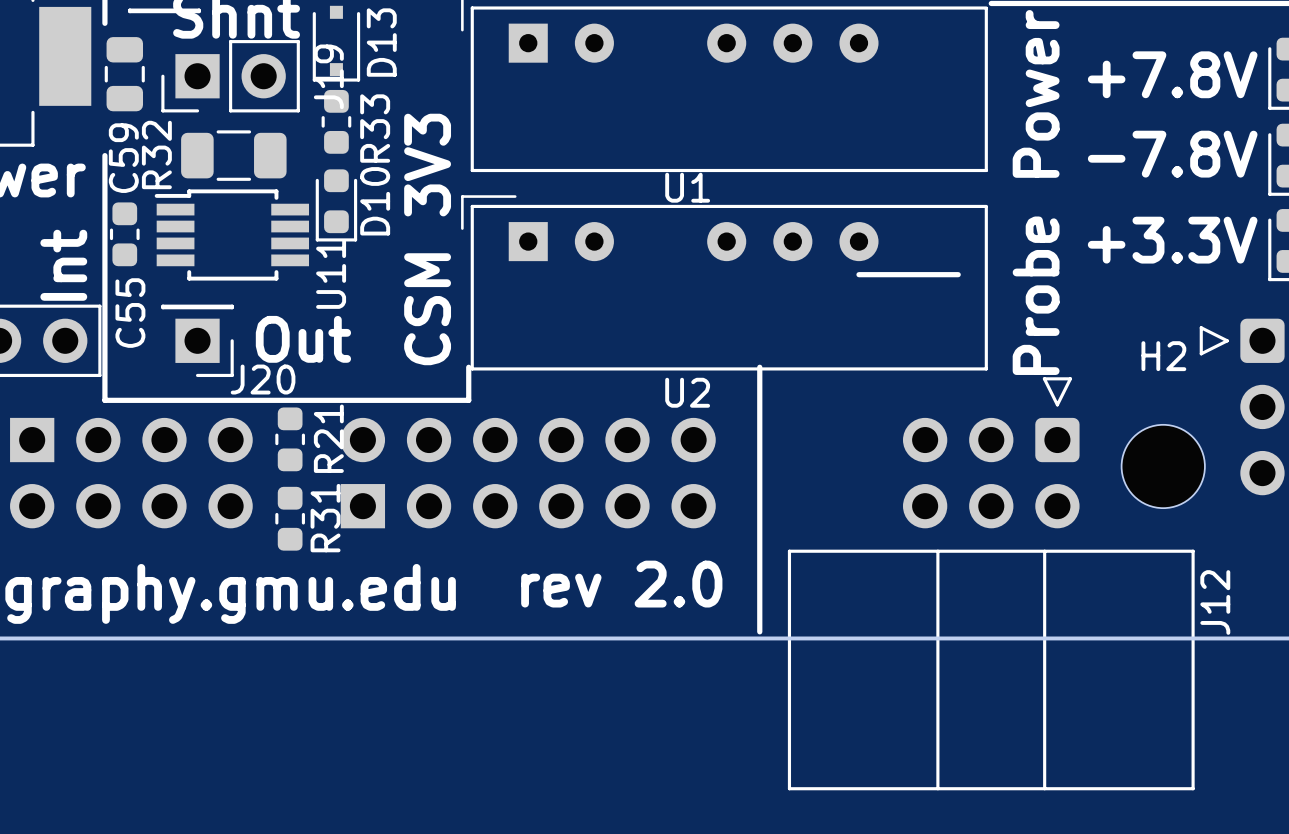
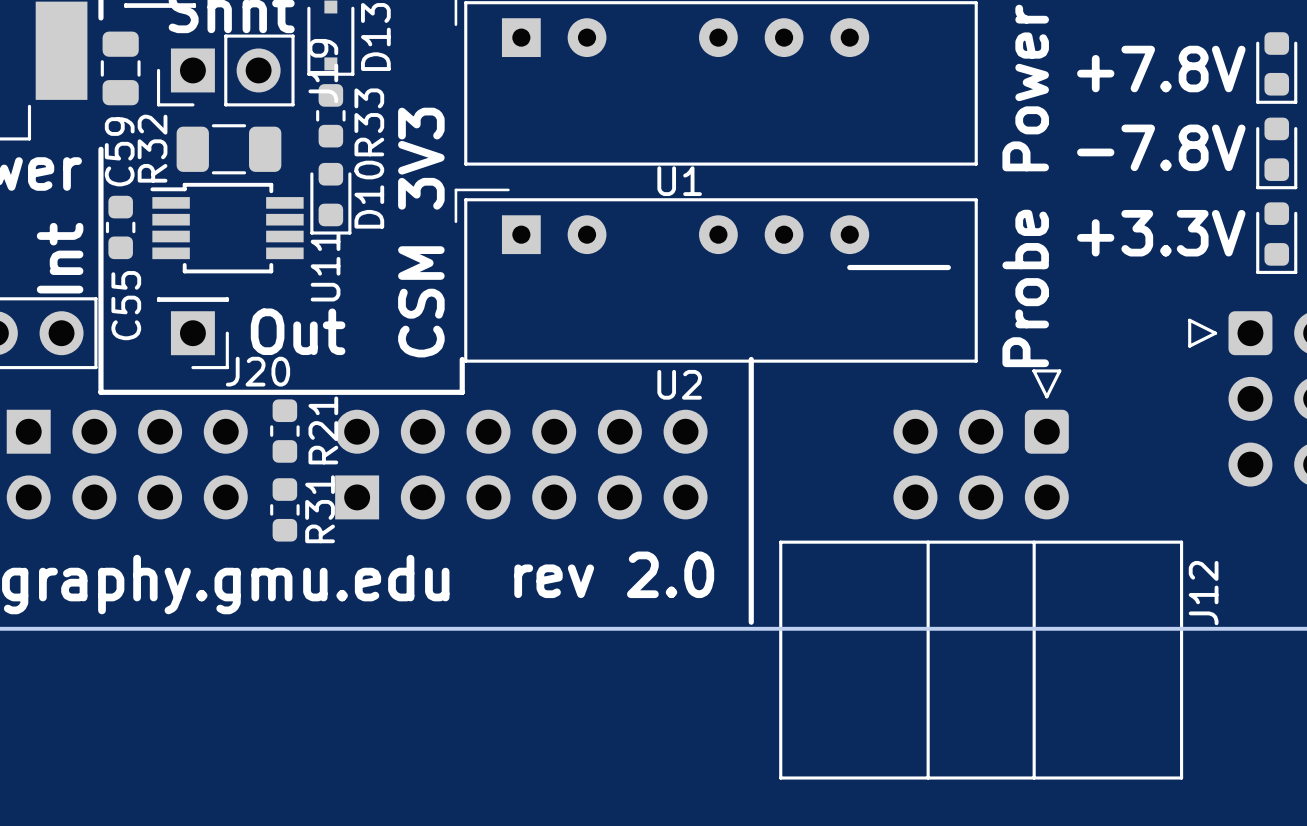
H2: (1163, 466) -> none

